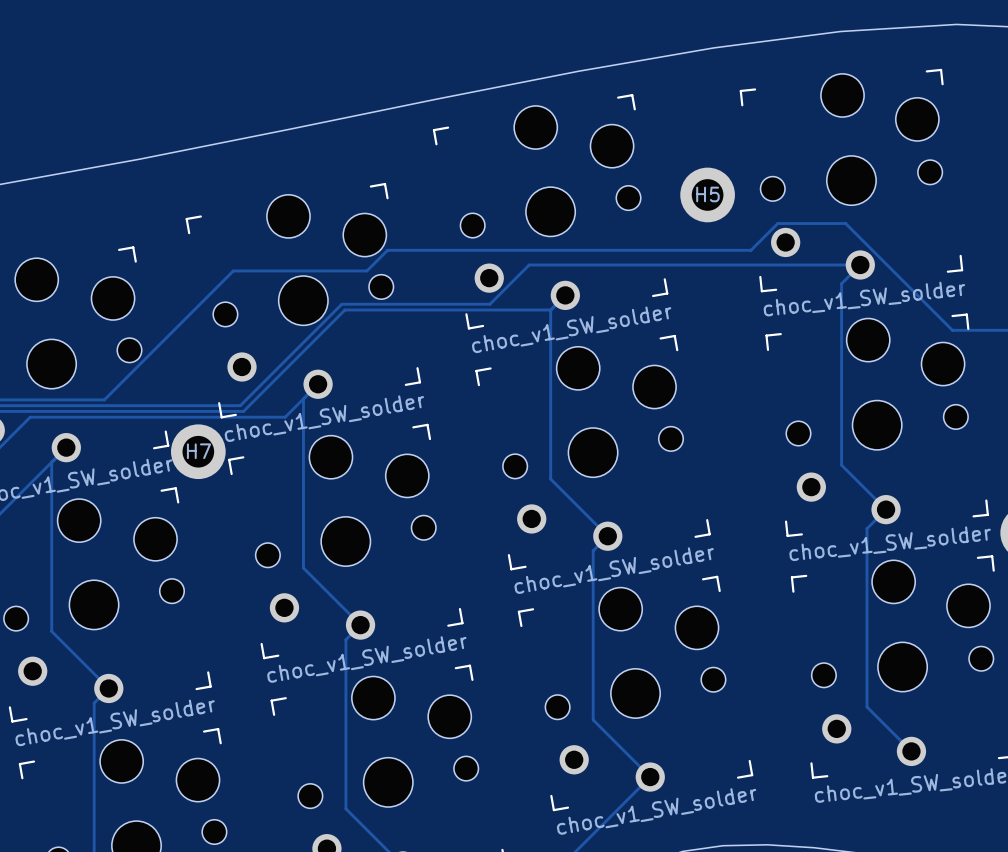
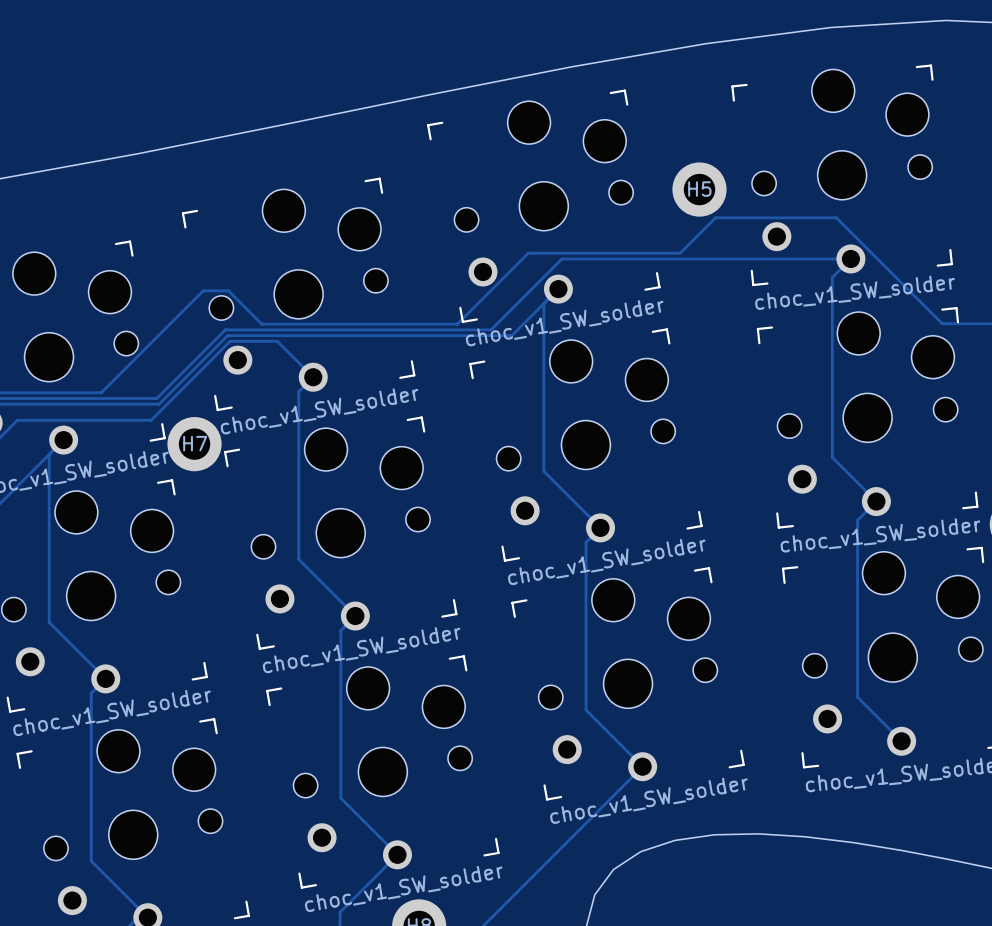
track: (777, 223) (751, 250) (387, 250) (366, 270) (233, 270) (207, 297) -> (483, 297) (457, 324) (261, 324) (228, 290) (203, 290)
track: (529, 264) (568, 264) -> (522, 258) (528, 253) (680, 253) (715, 217) (769, 217)
track: (489, 304) (341, 304) (240, 405) (160, 405) -> (562, 258) (491, 329) (225, 329) (156, 398)
track: (550, 310) (344, 310) (243, 411) (162, 411) -> (543, 303) (511, 335) (227, 335) (159, 404)
track: (303, 398) (285, 417) (30, 417) (19, 427) -> (313, 377) (277, 341) (230, 341) (151, 420) (17, 420)

